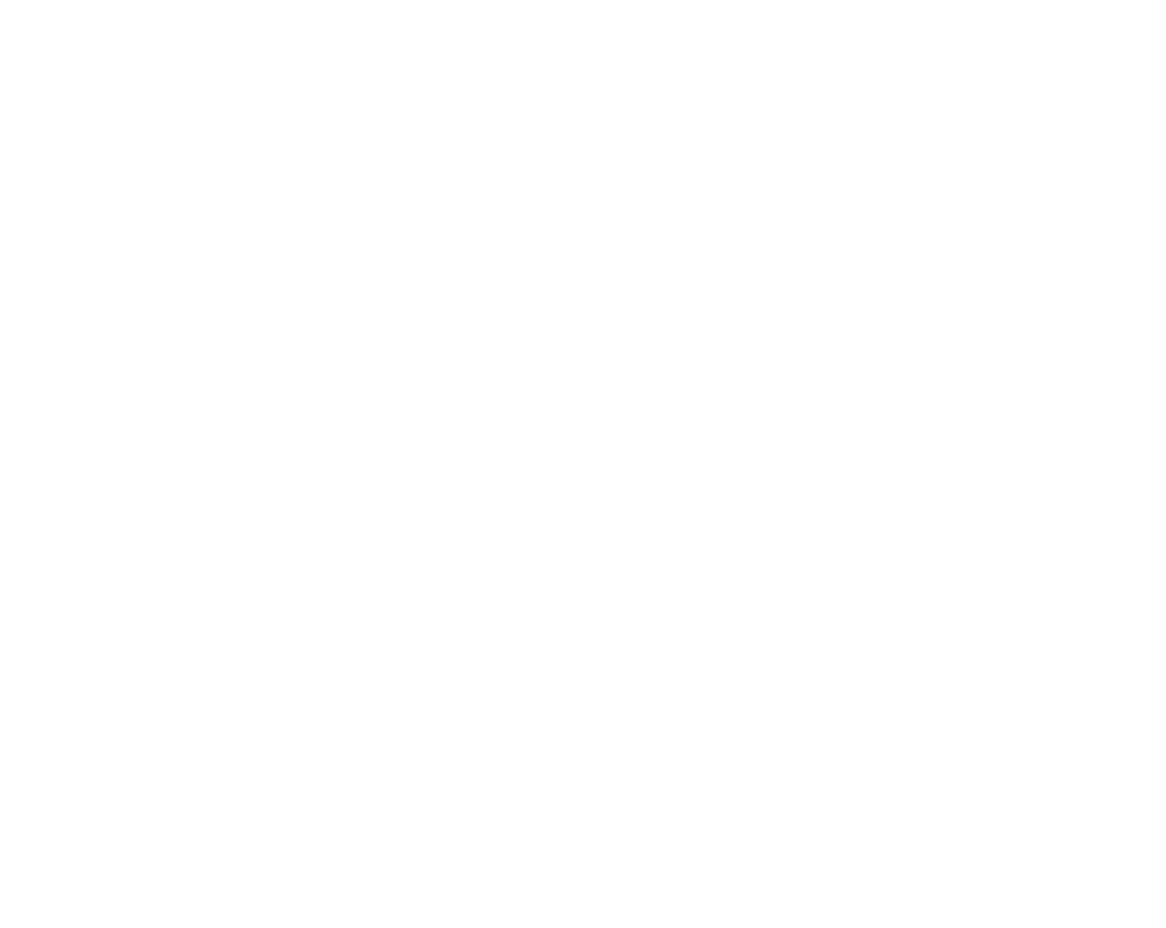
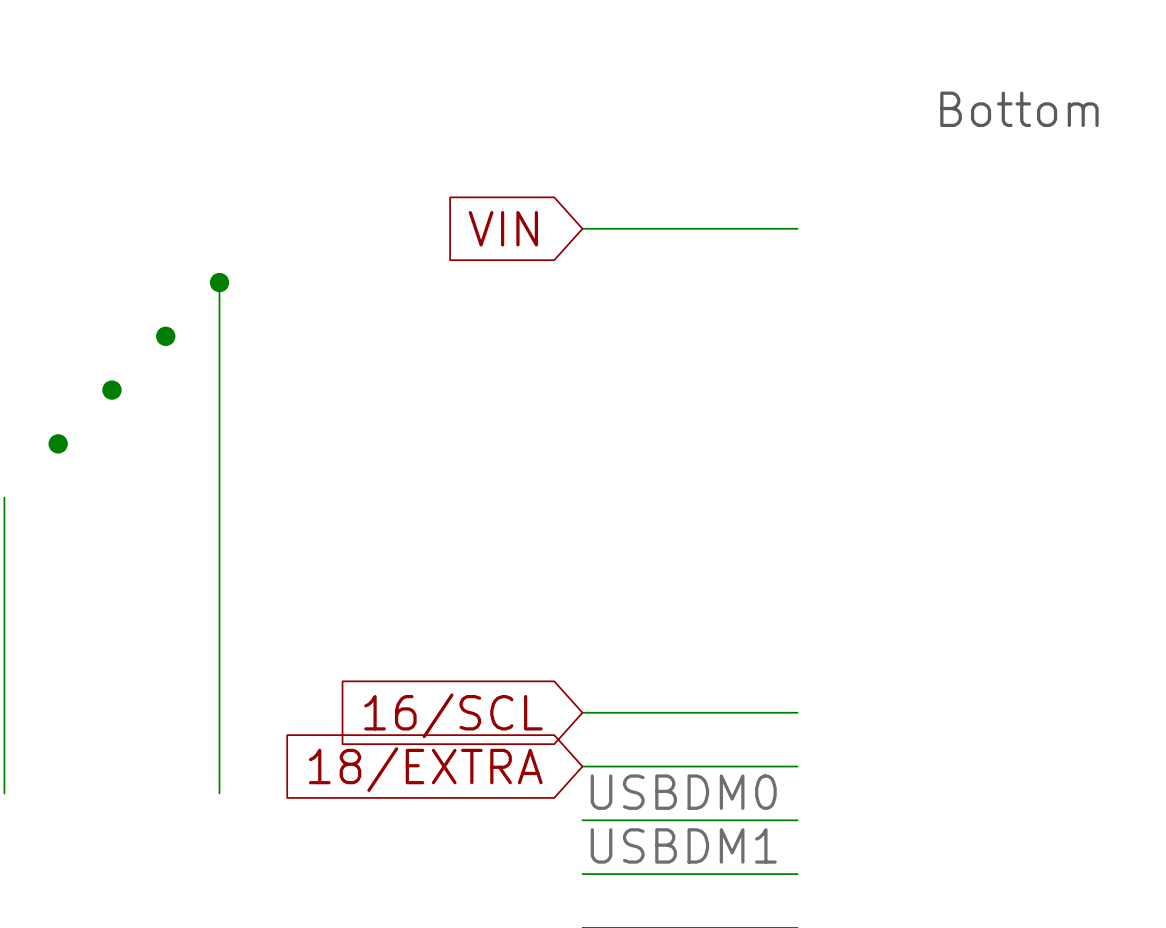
text: none -> Bottom (1019, 109)
global label: none -> VIN (503, 228)
wire: none -> (582, 228) (797, 228)
wire: none -> (219, 282) (219, 793)
junction: none -> (219, 282)
junction: none -> (165, 336)
junction: none -> (111, 390)
junction: none -> (58, 443)
wire: none -> (4, 497) (4, 793)
wire: none -> (582, 712) (797, 712)
global label: none -> 16/SCL (453, 715)
wire: none -> (582, 766) (797, 766)
global label: none -> 18/EXTRA (425, 769)
label: none -> USBDM0 (683, 792)
wire: none -> (582, 820) (797, 820)
label: none -> USBDM1 (683, 845)
wire: none -> (582, 874) (797, 874)
wire: none -> (582, 927) (797, 927)

